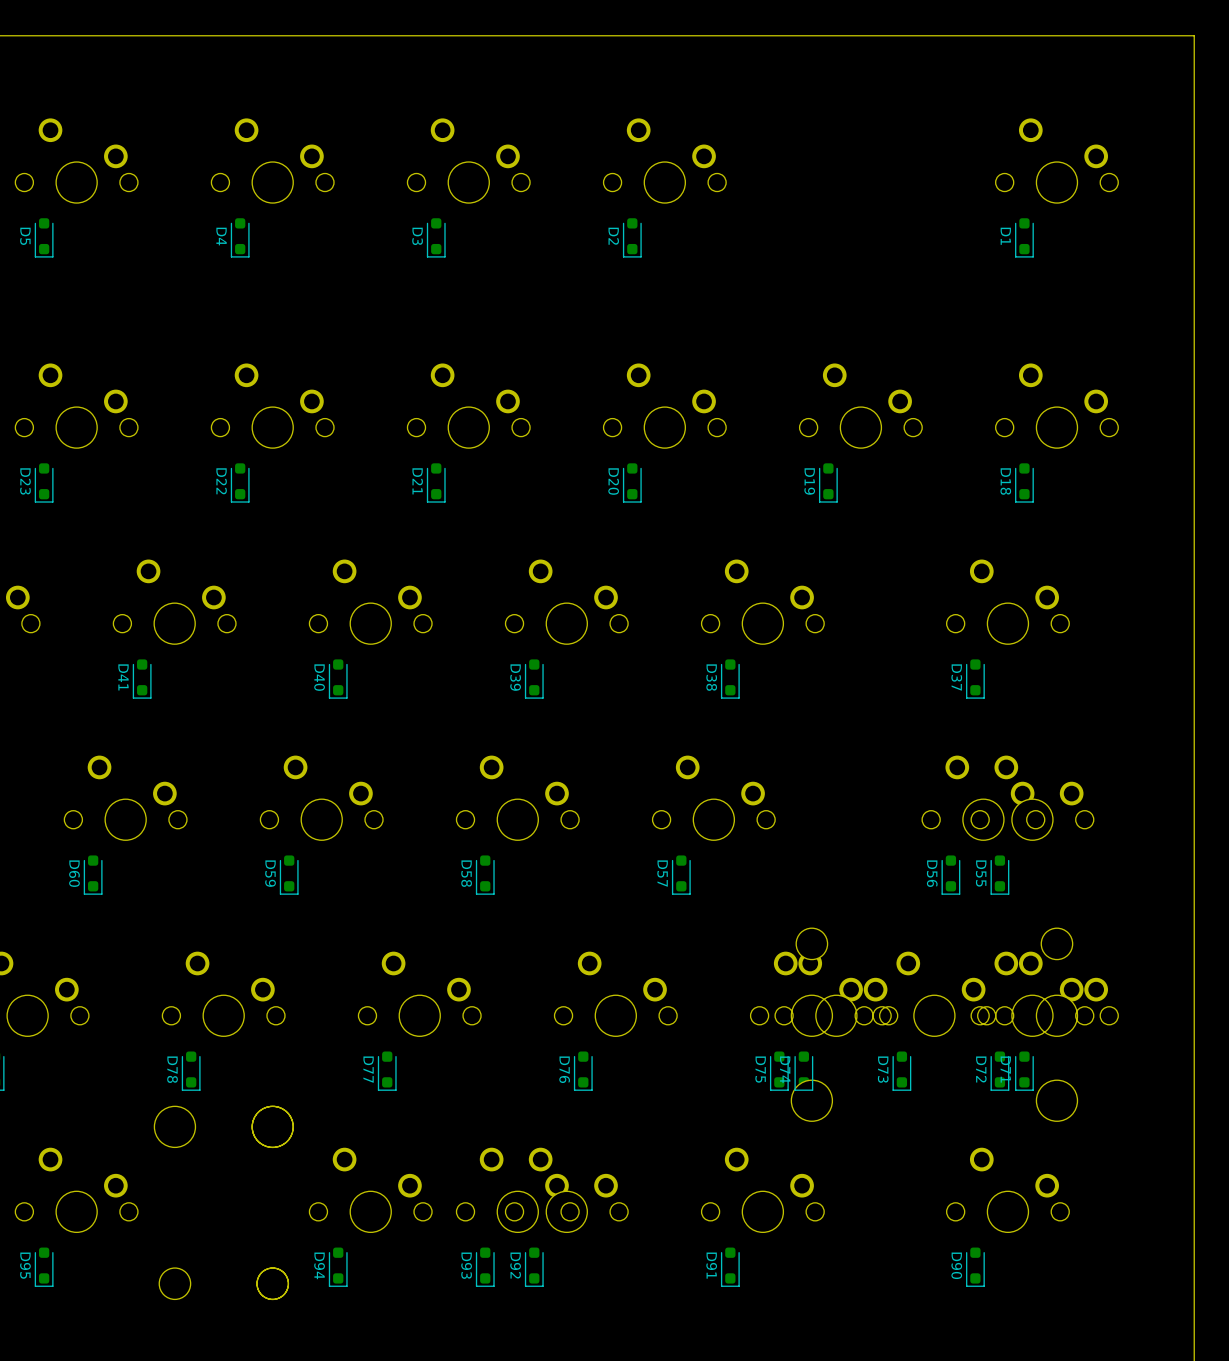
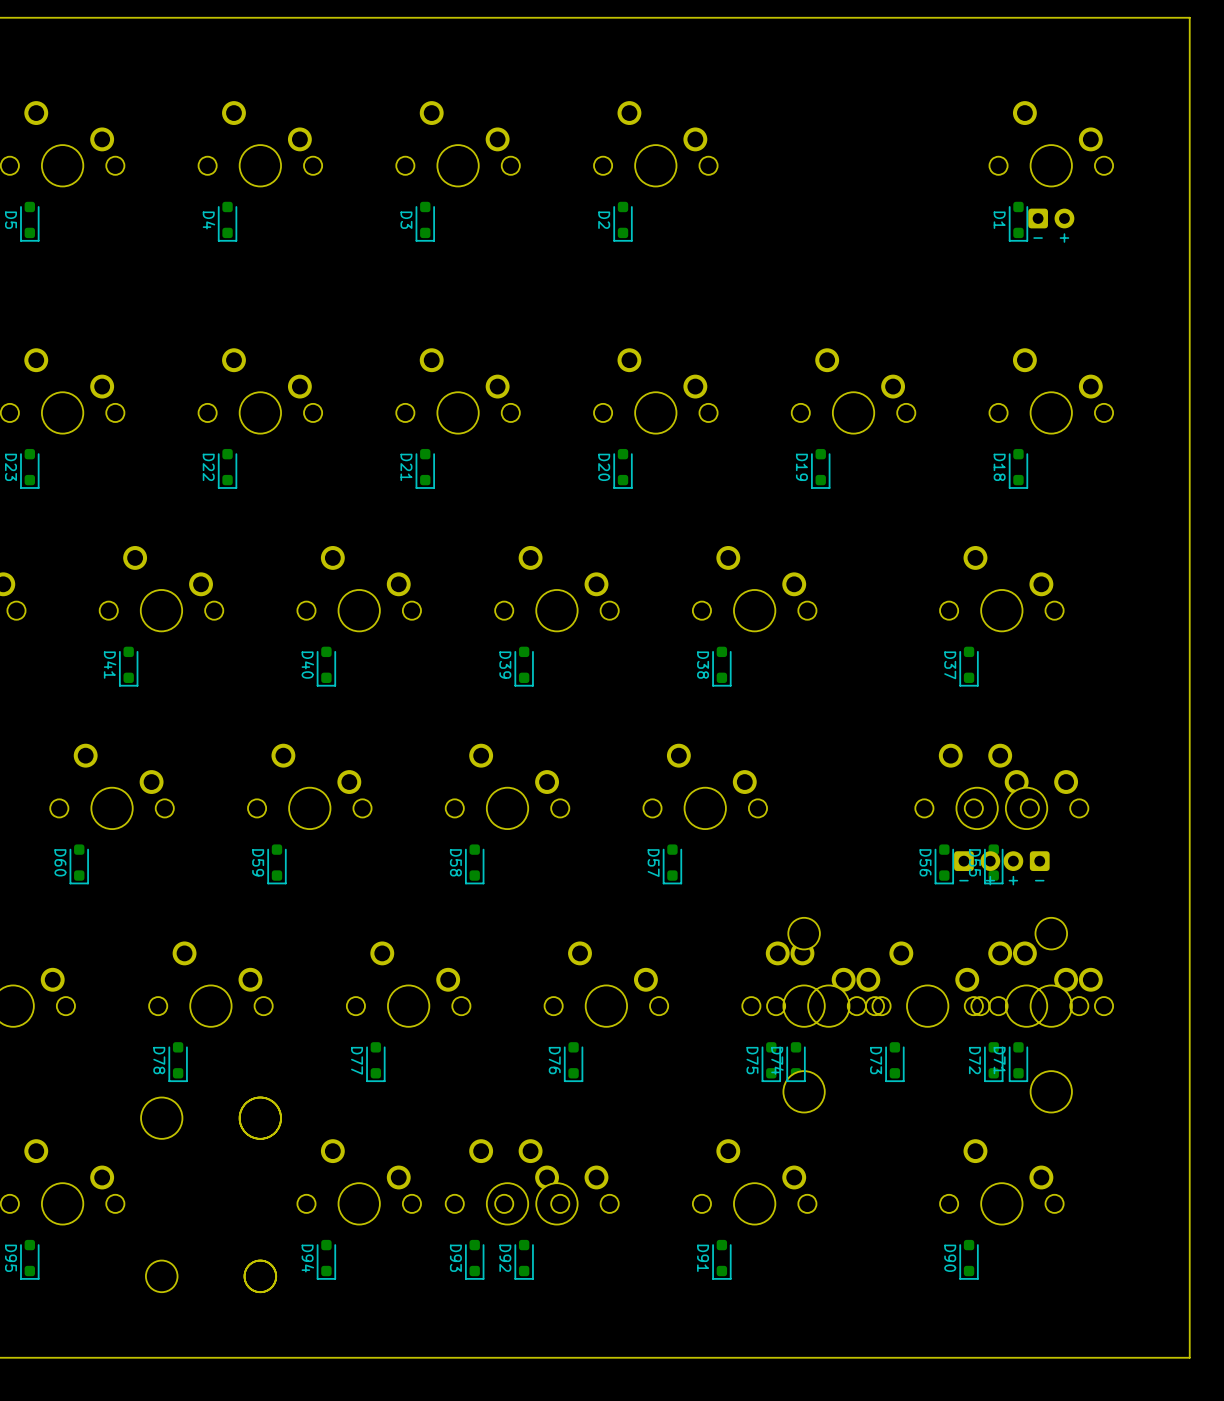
part: none -> (1051, 218)
part: none -> (1001, 861)

